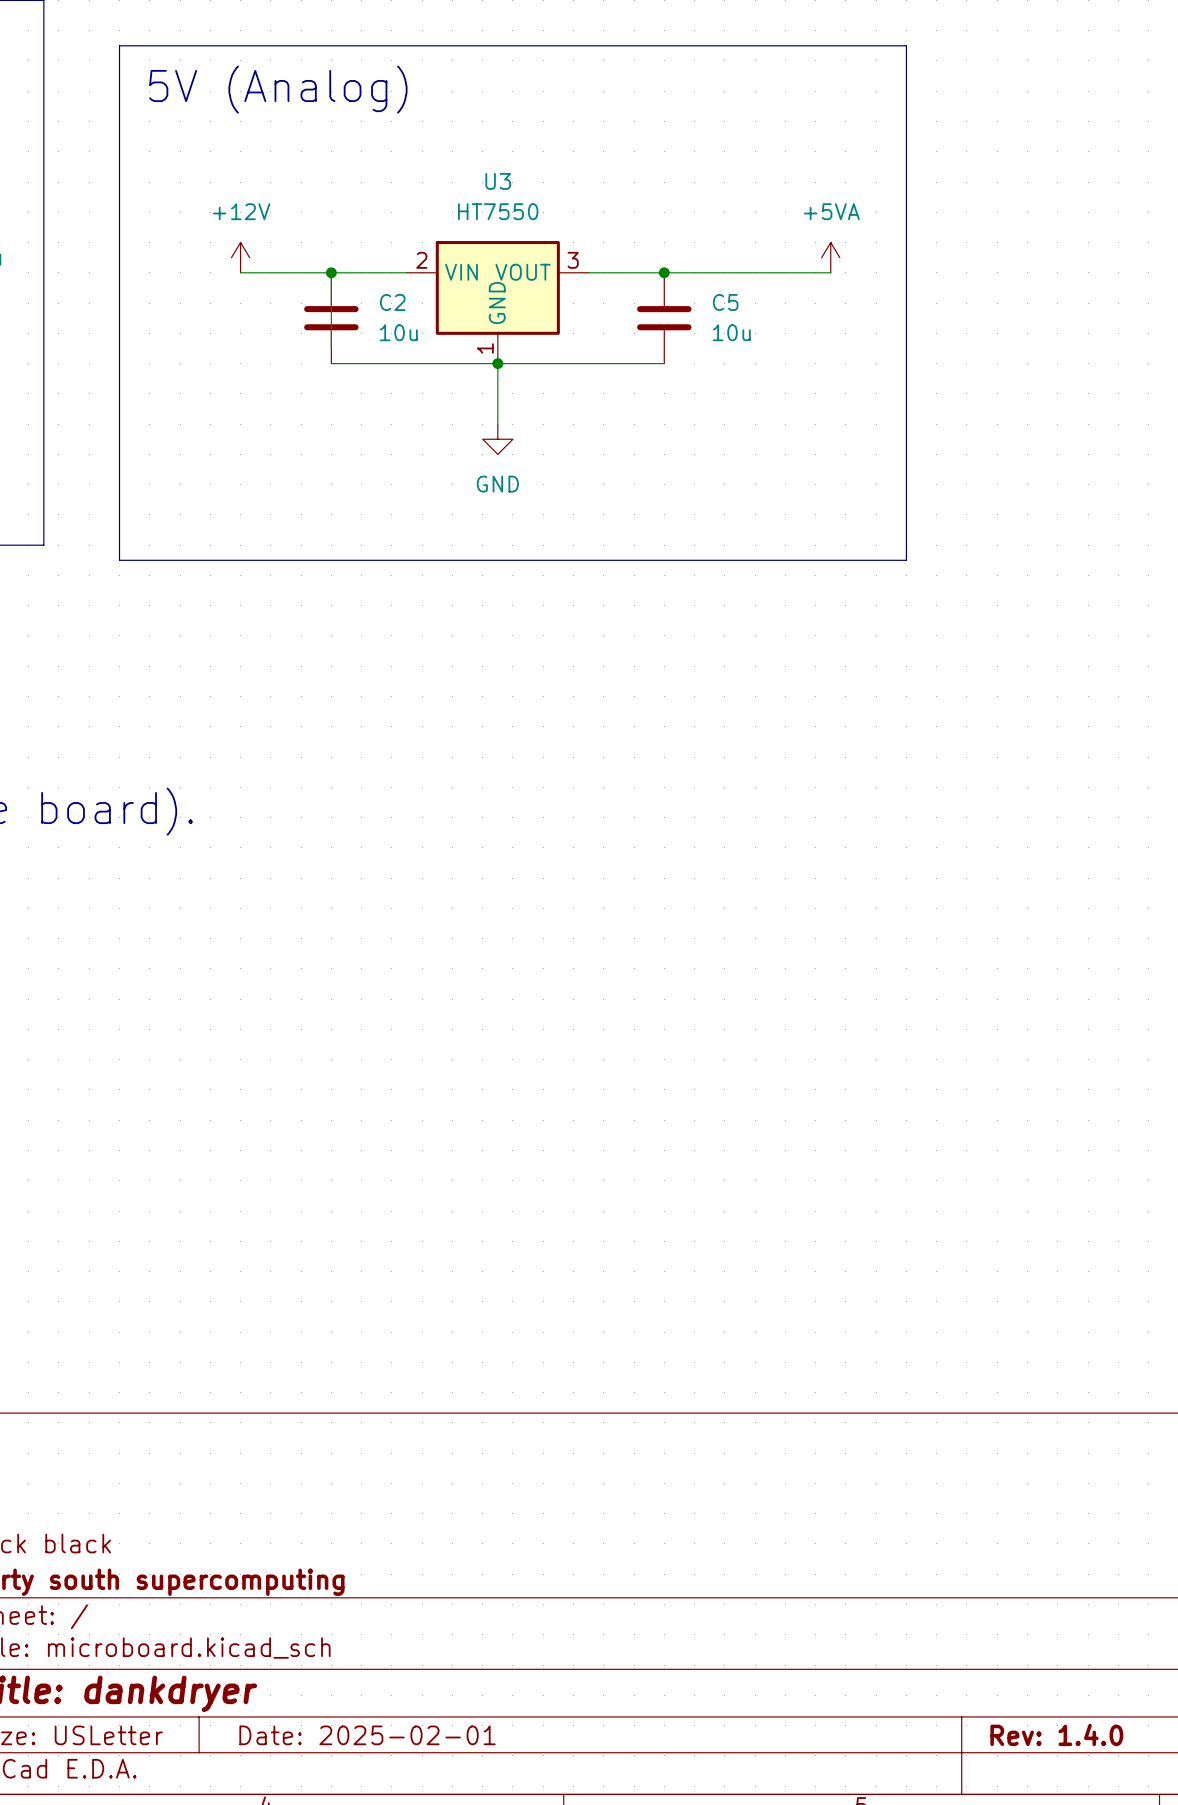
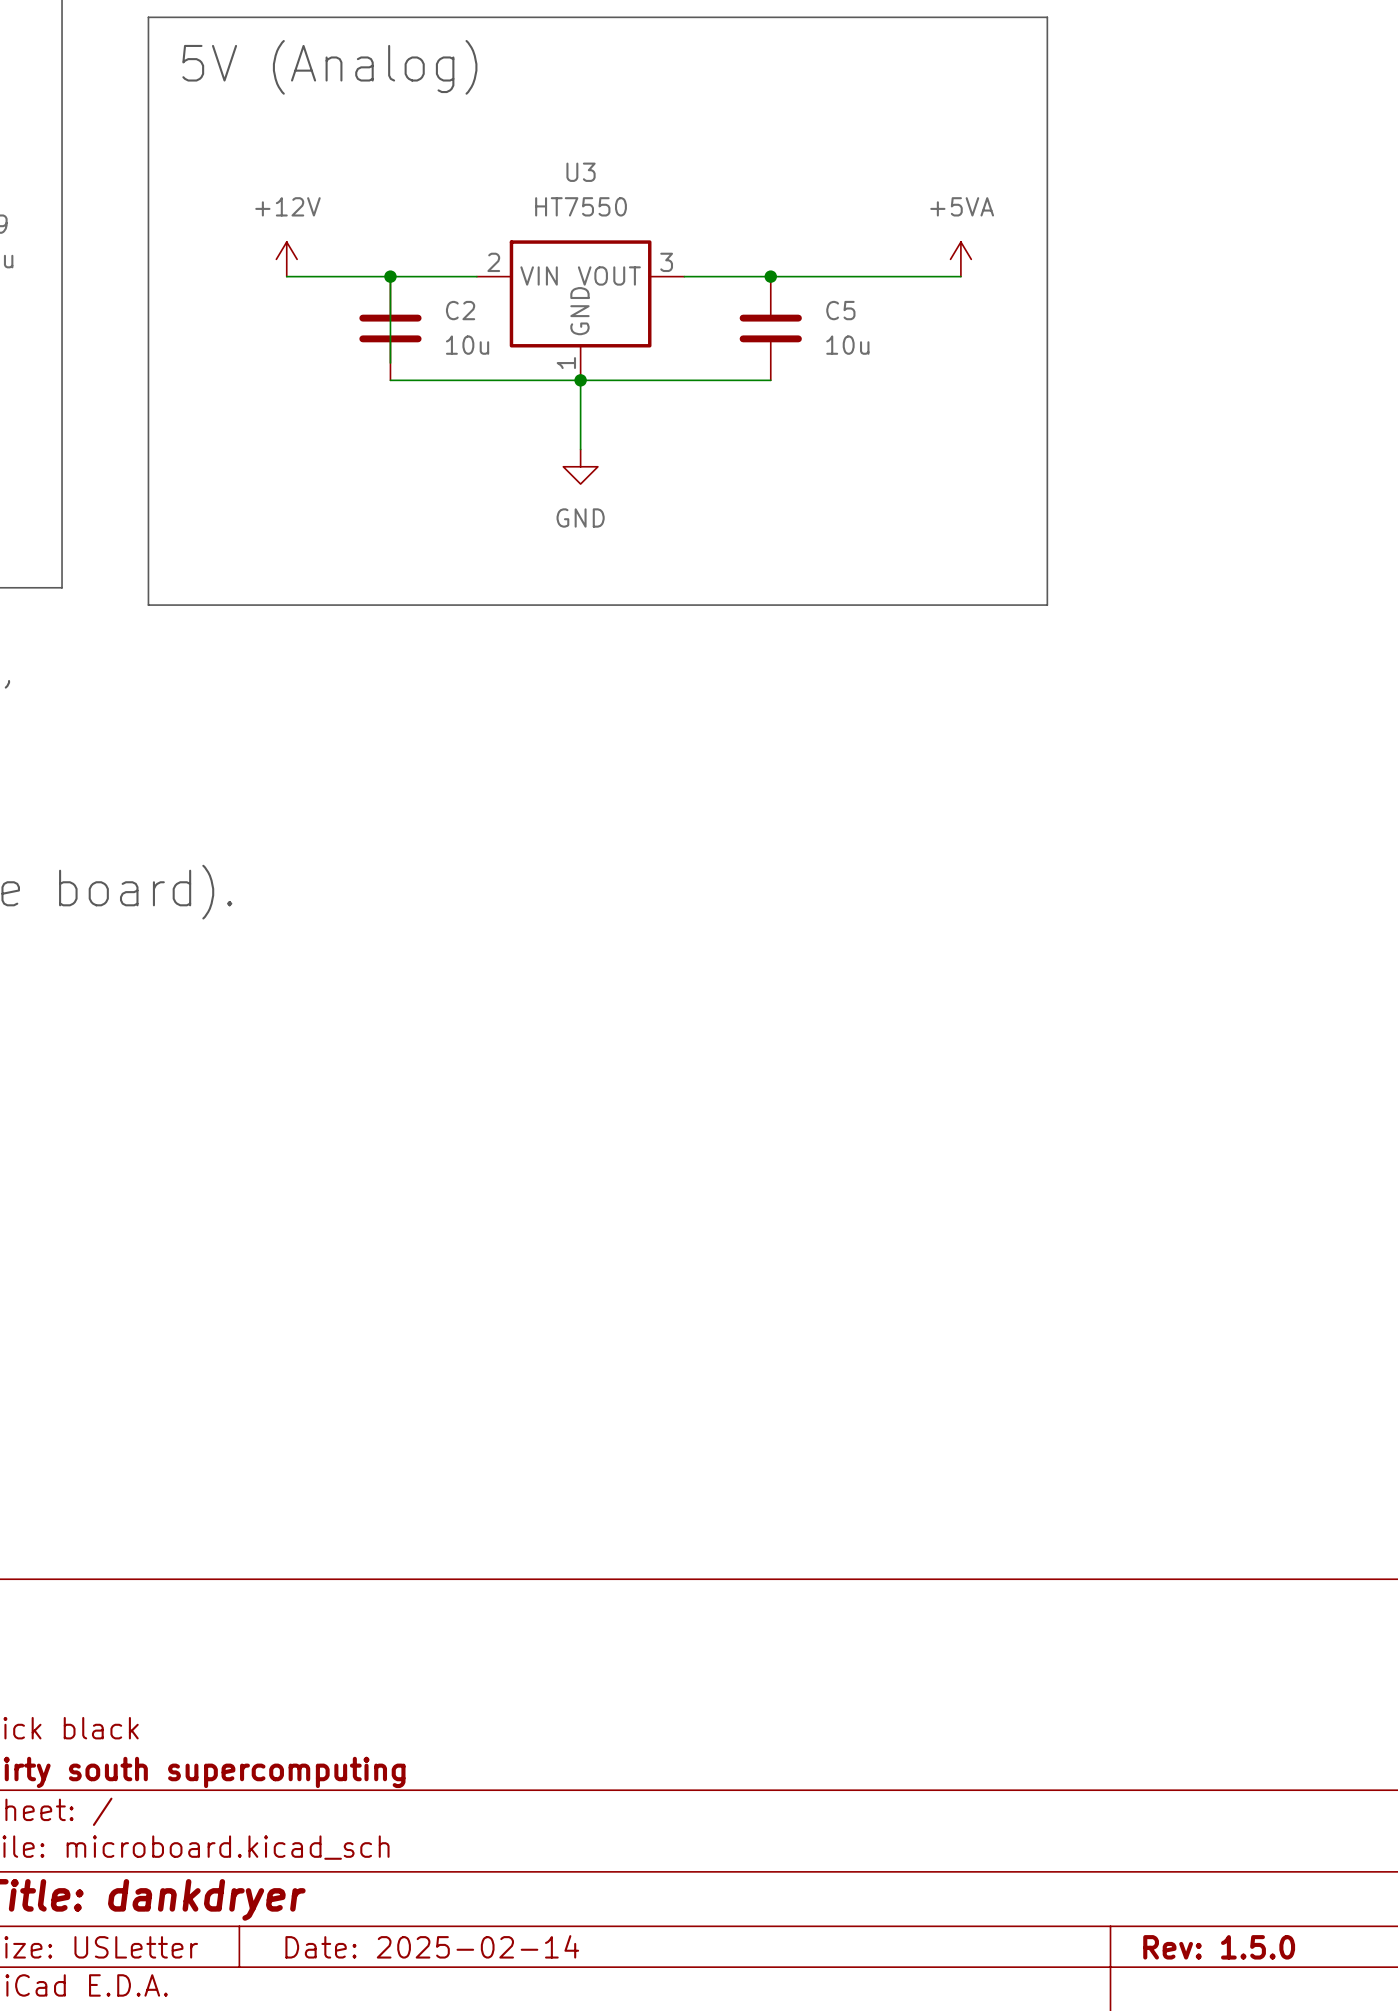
title block: Rev: 1.4.0 (1056, 1734) -> Rev: 1.5.0 (1219, 1947)
title block: Date: 2025-02-01 (367, 1735) -> Date: 2025-02-14 (432, 1946)

